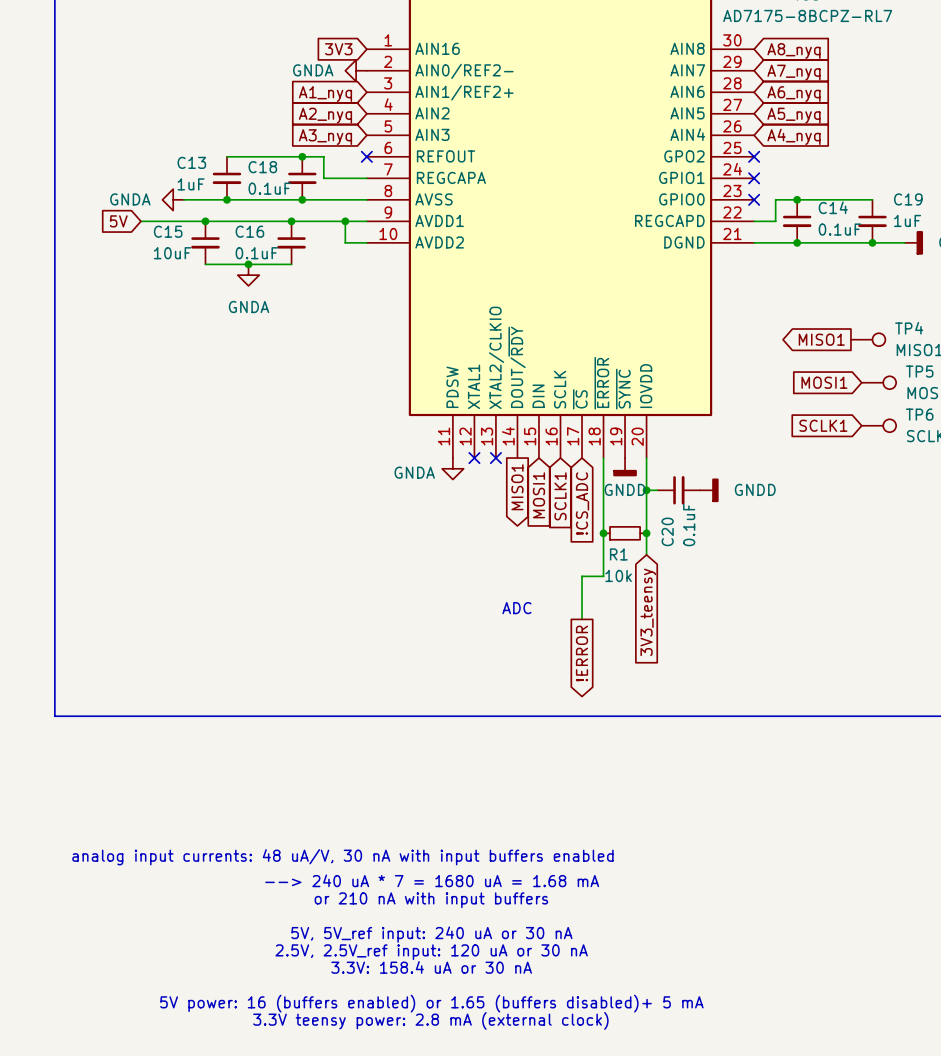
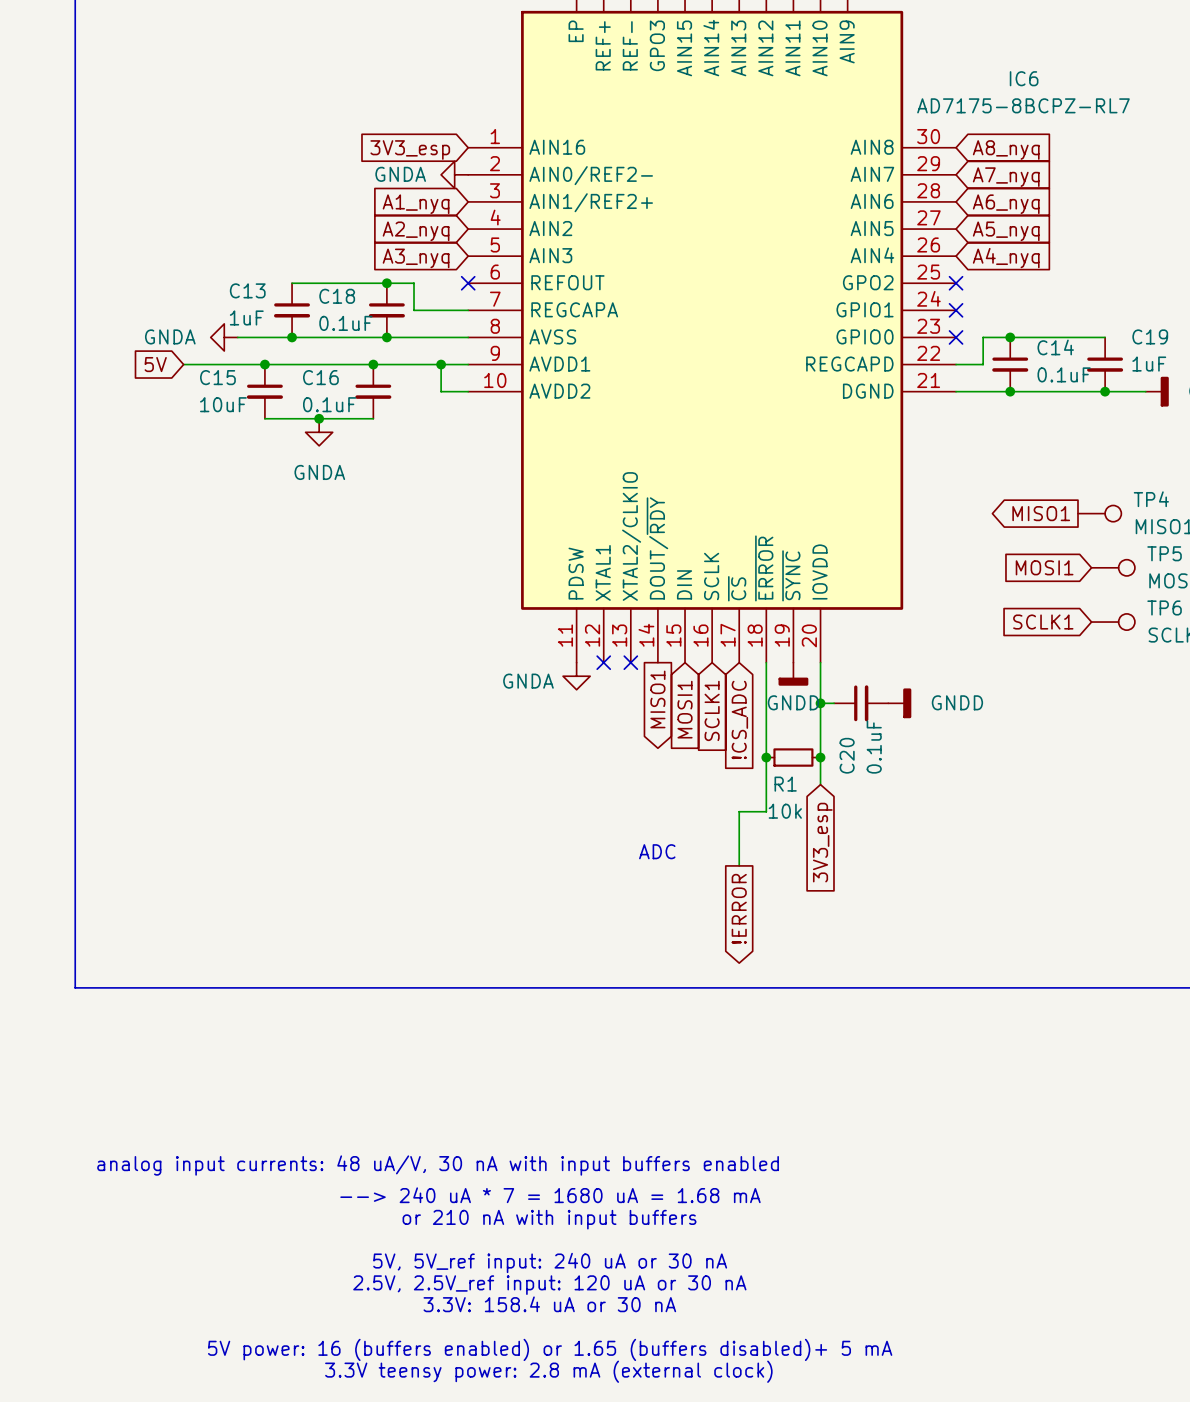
global label: 3V3 (338, 49) -> 3V3_esp (410, 150)
global label: 3V3_teensy (648, 612) -> 3V3_esp (822, 842)

